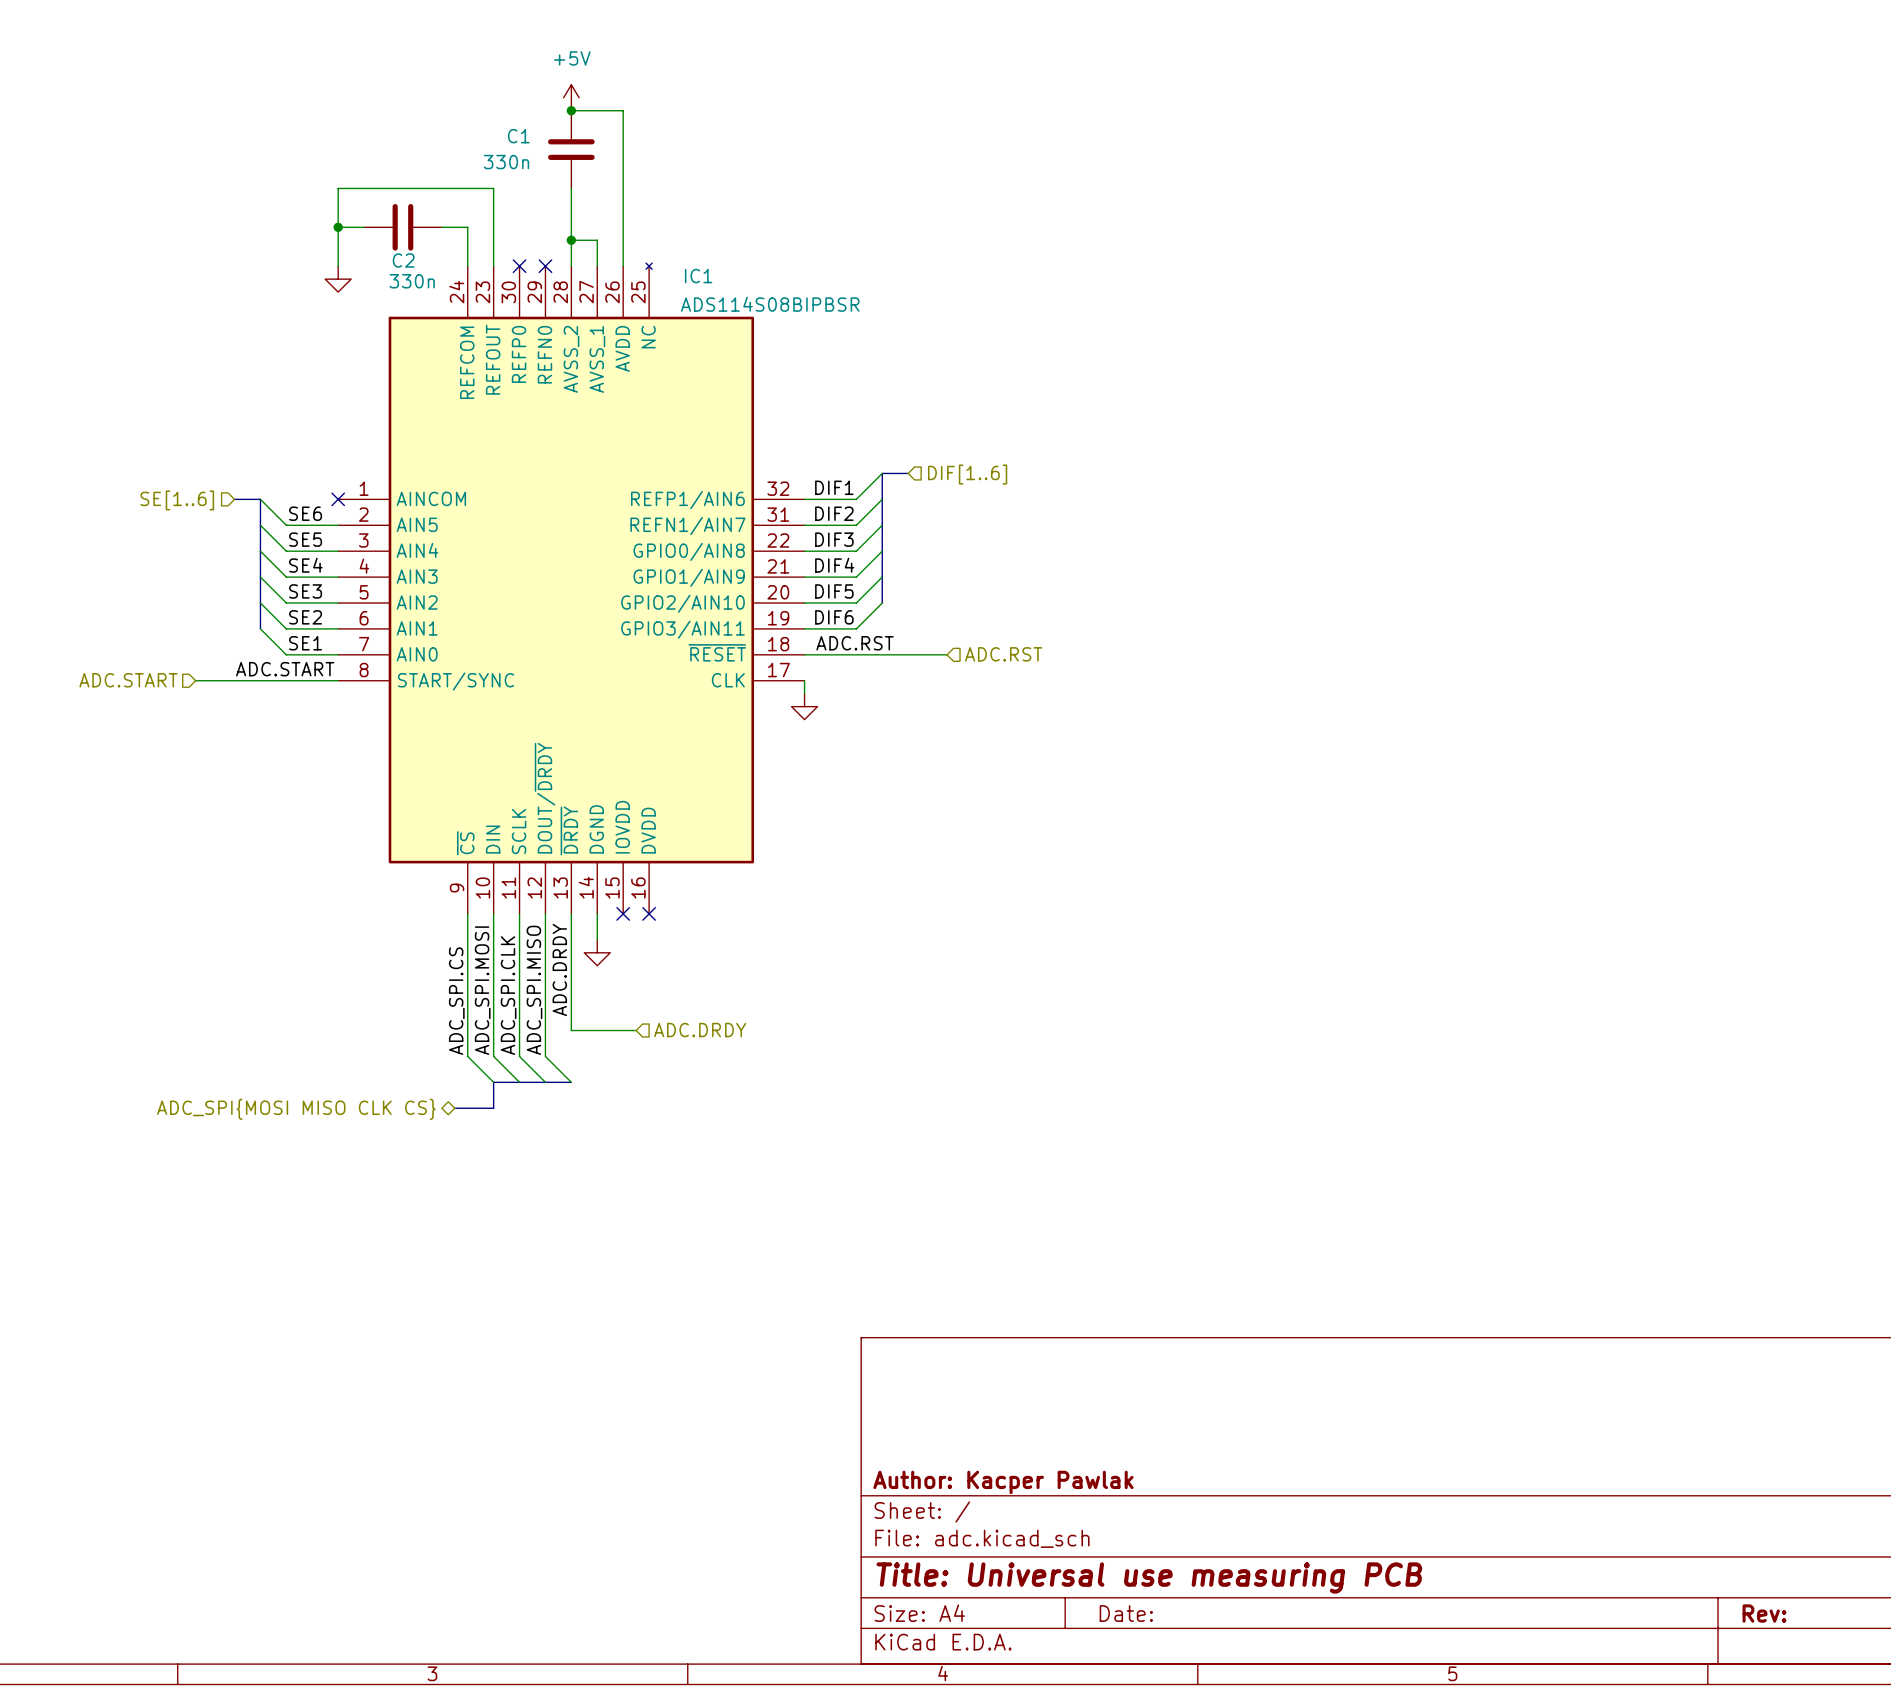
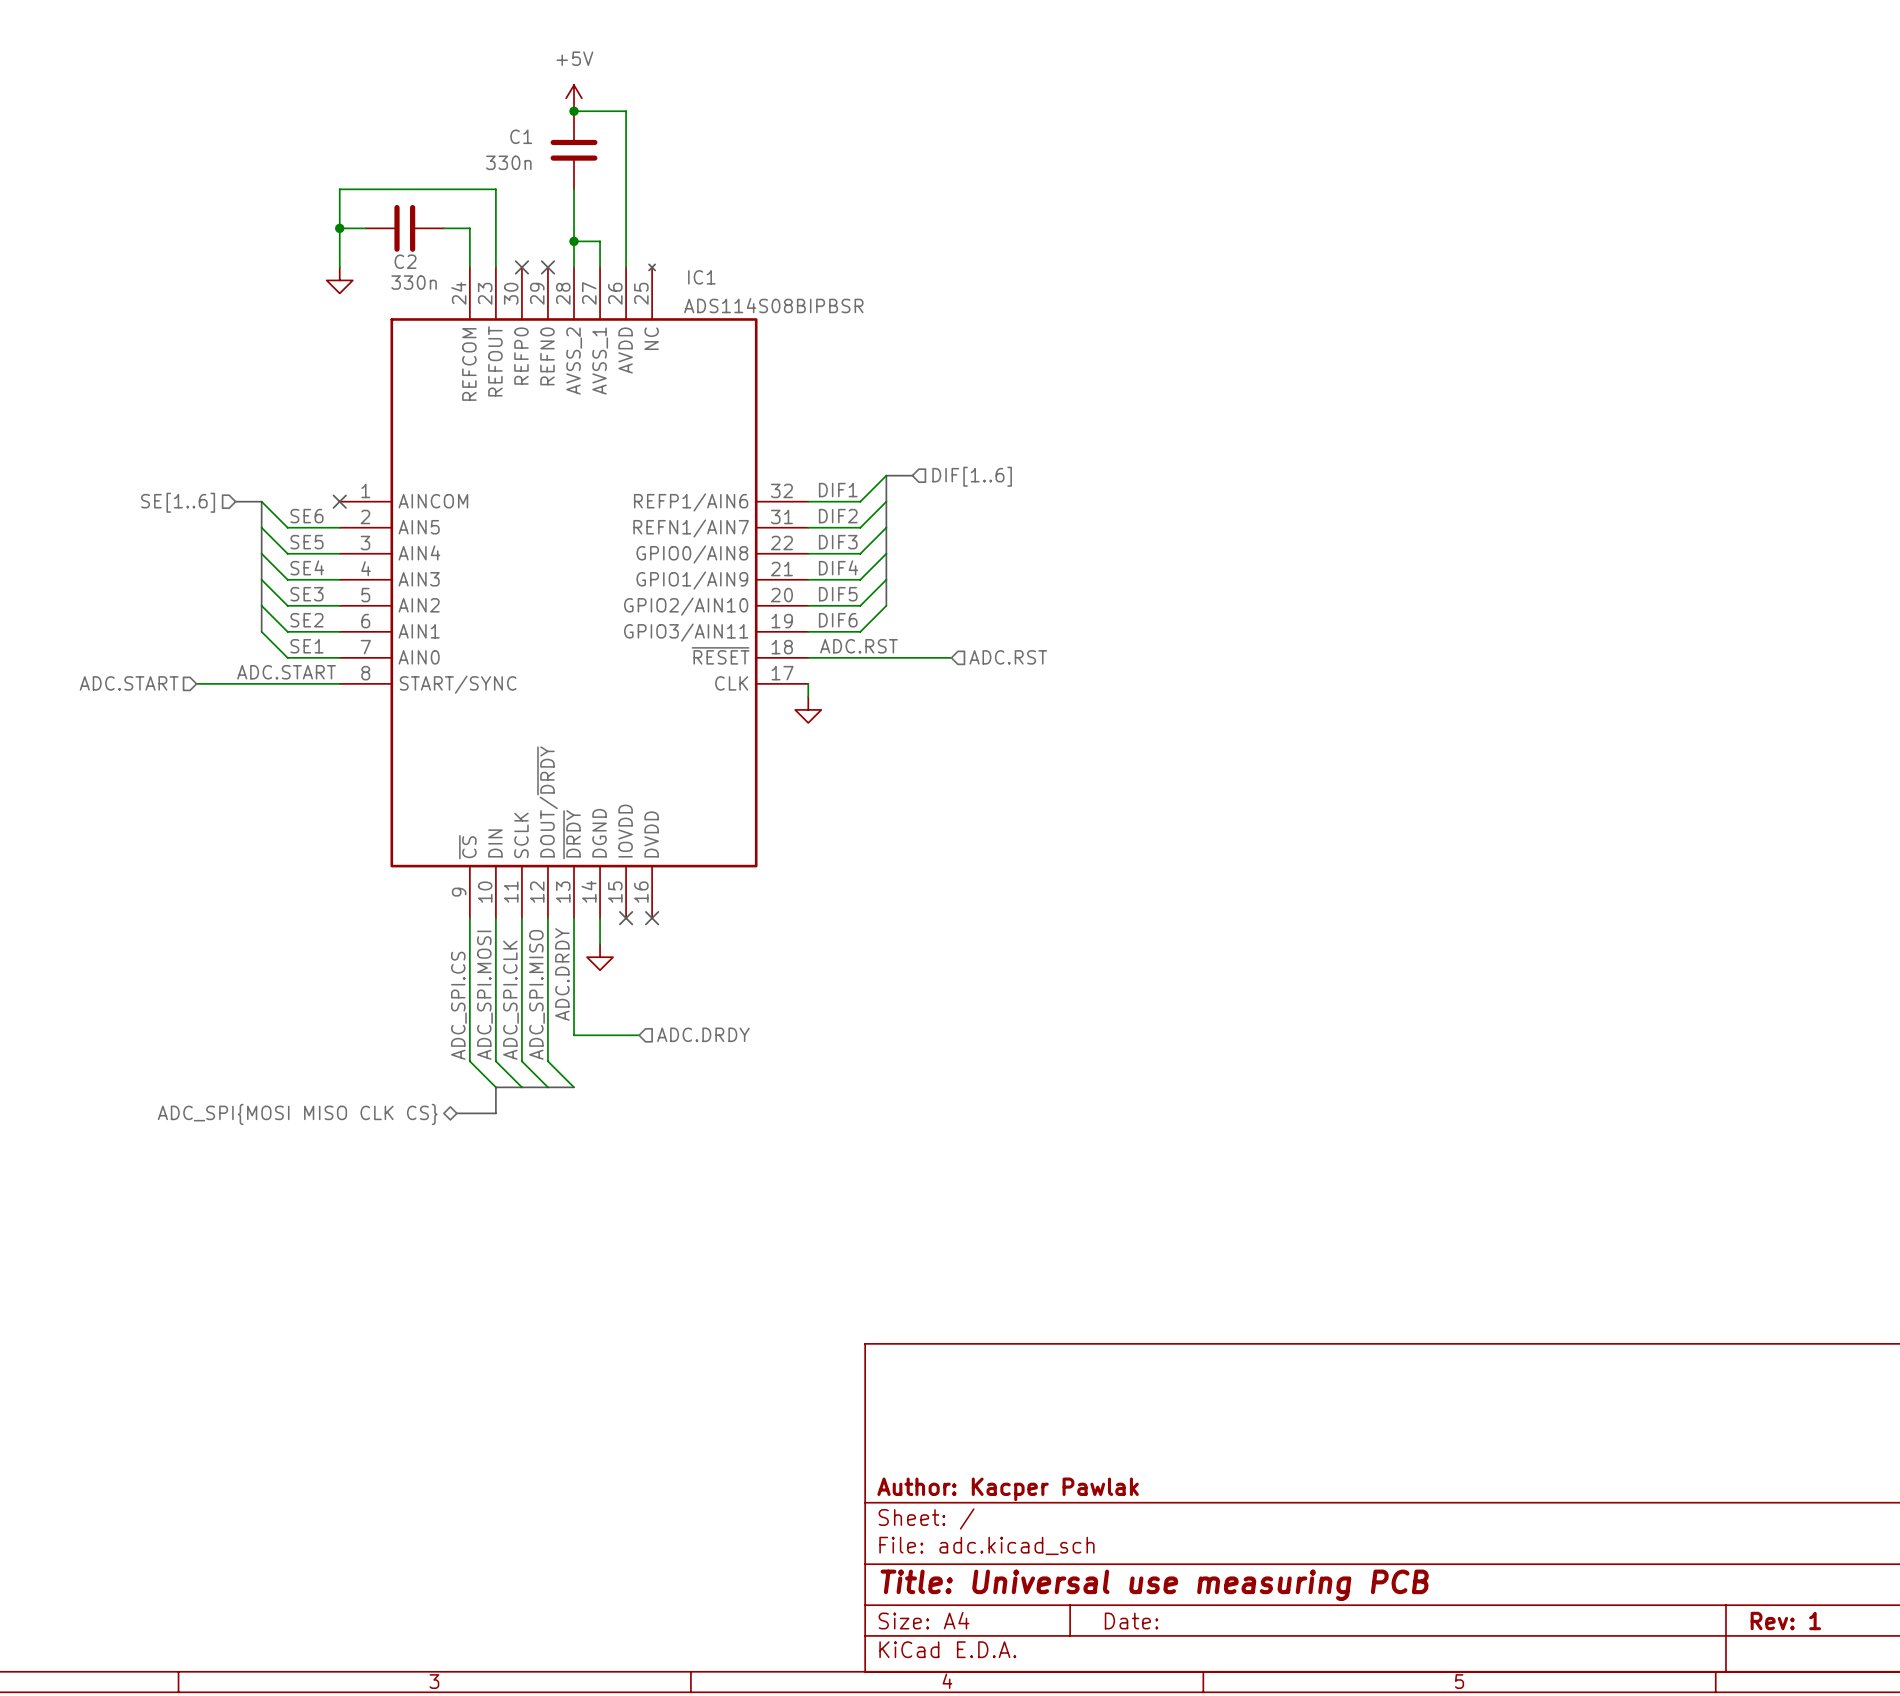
title block: Rev: (1764, 1613) -> Rev: 1 (1785, 1621)

